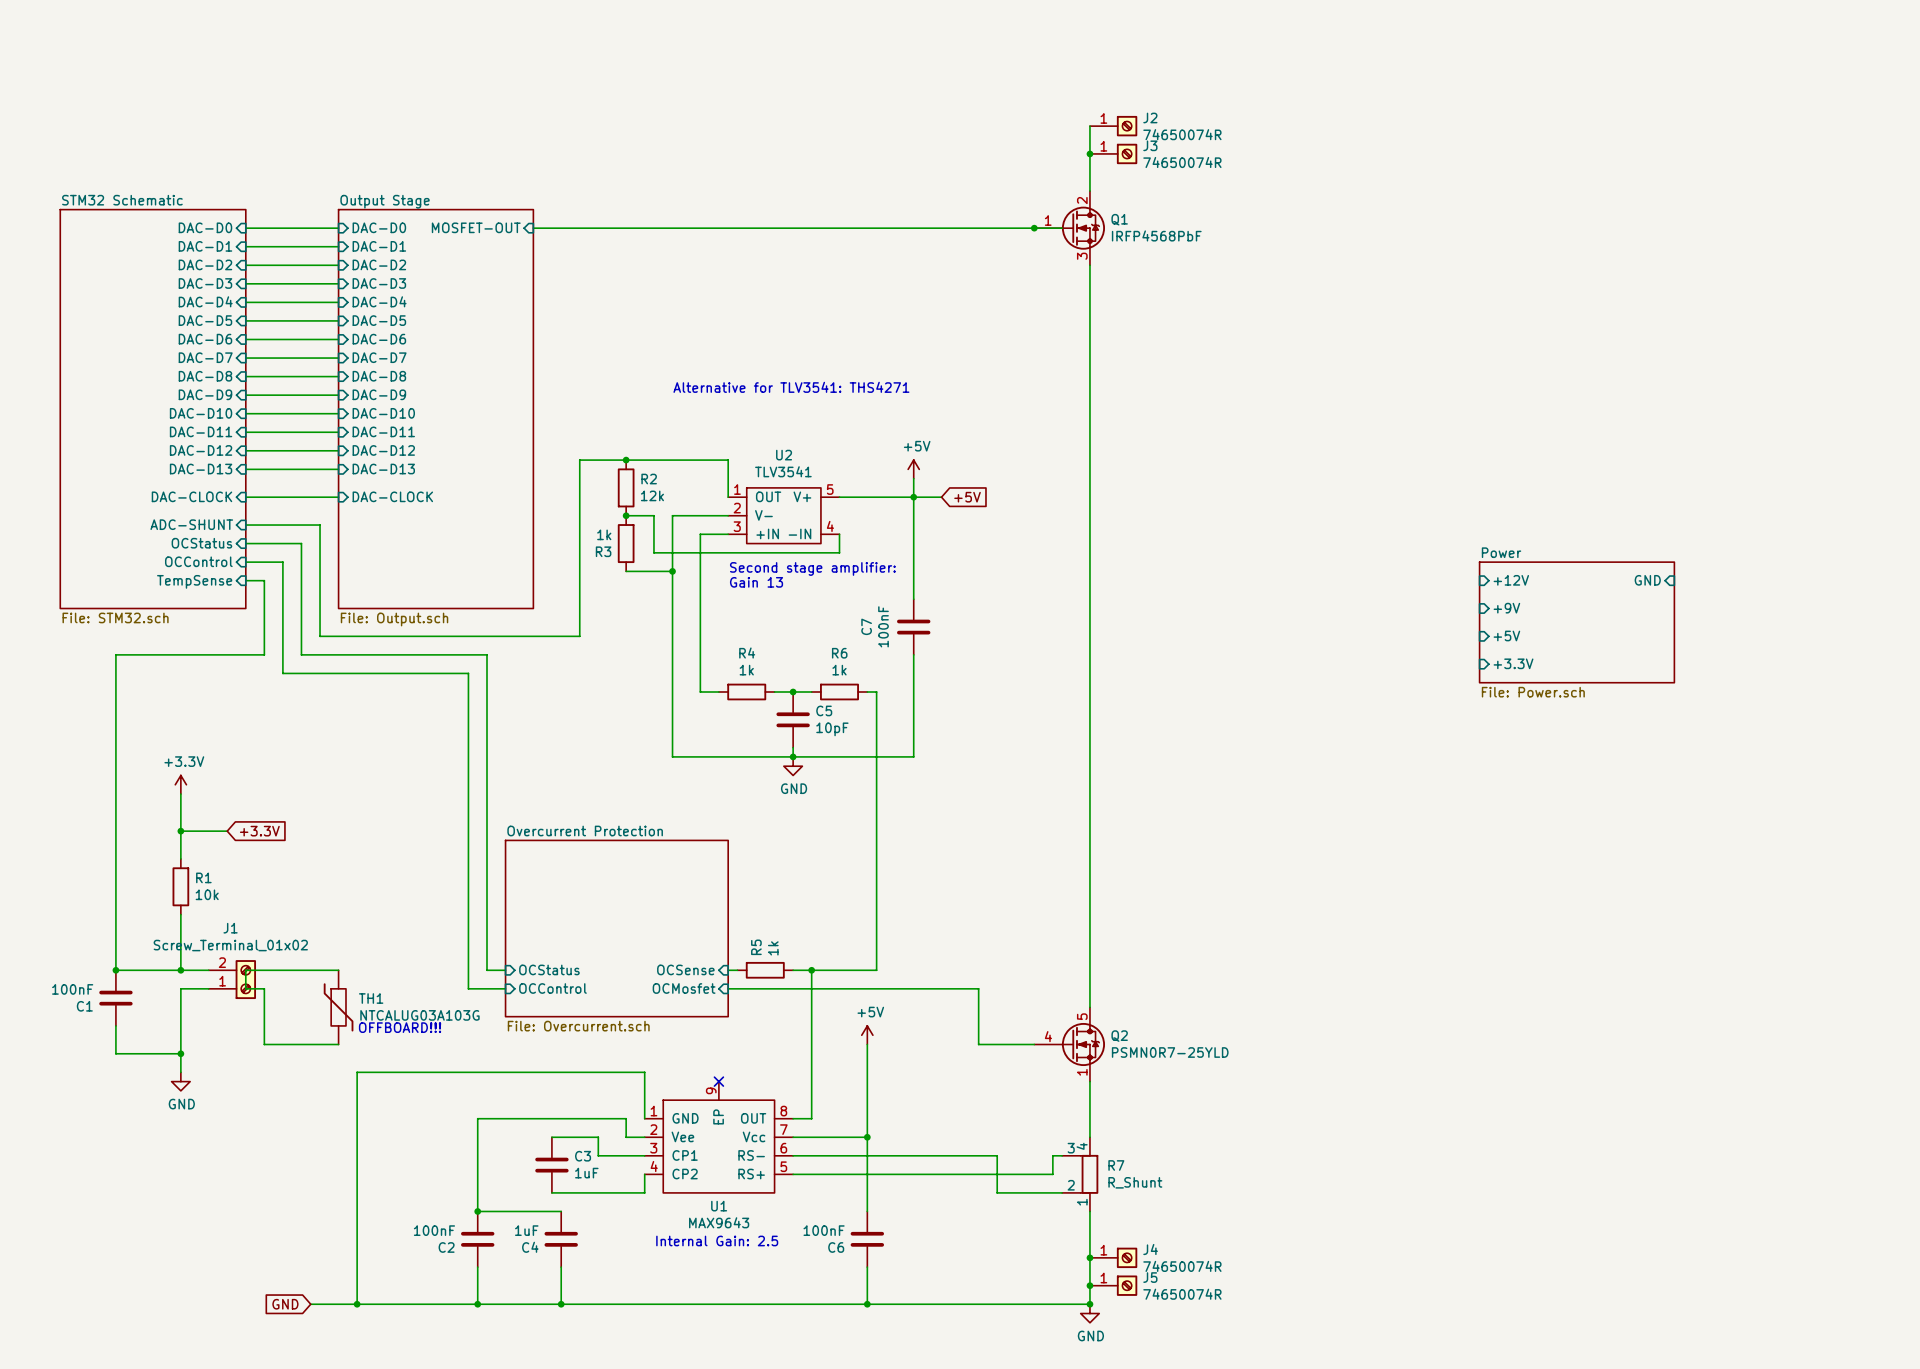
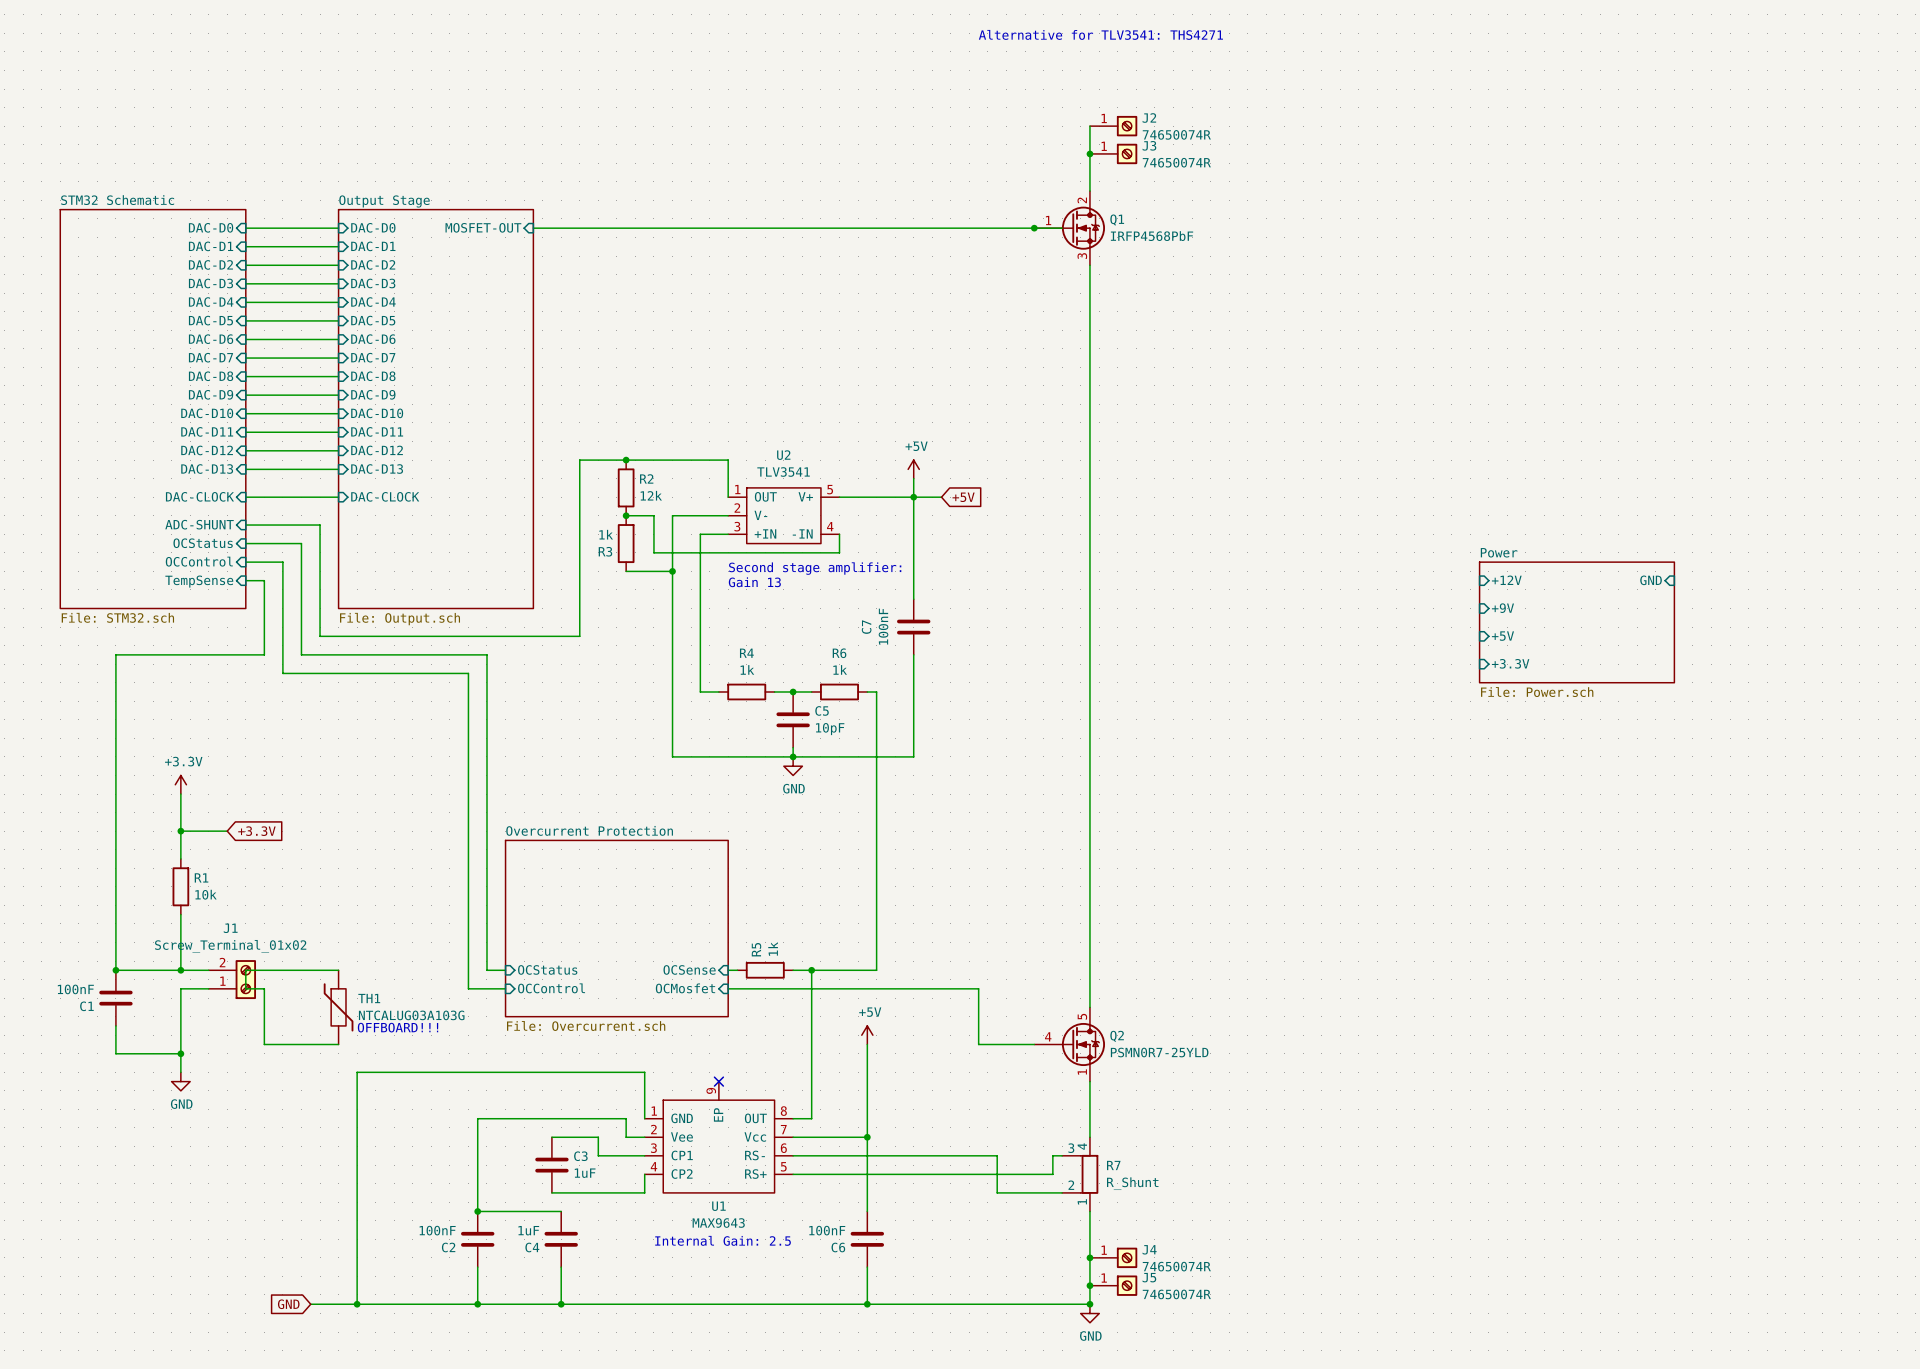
text: none -> Alternative for TLV3541: THS4271 (1100, 34)
text: Alternative for TLV3541: THS4271 (791, 387) -> none

